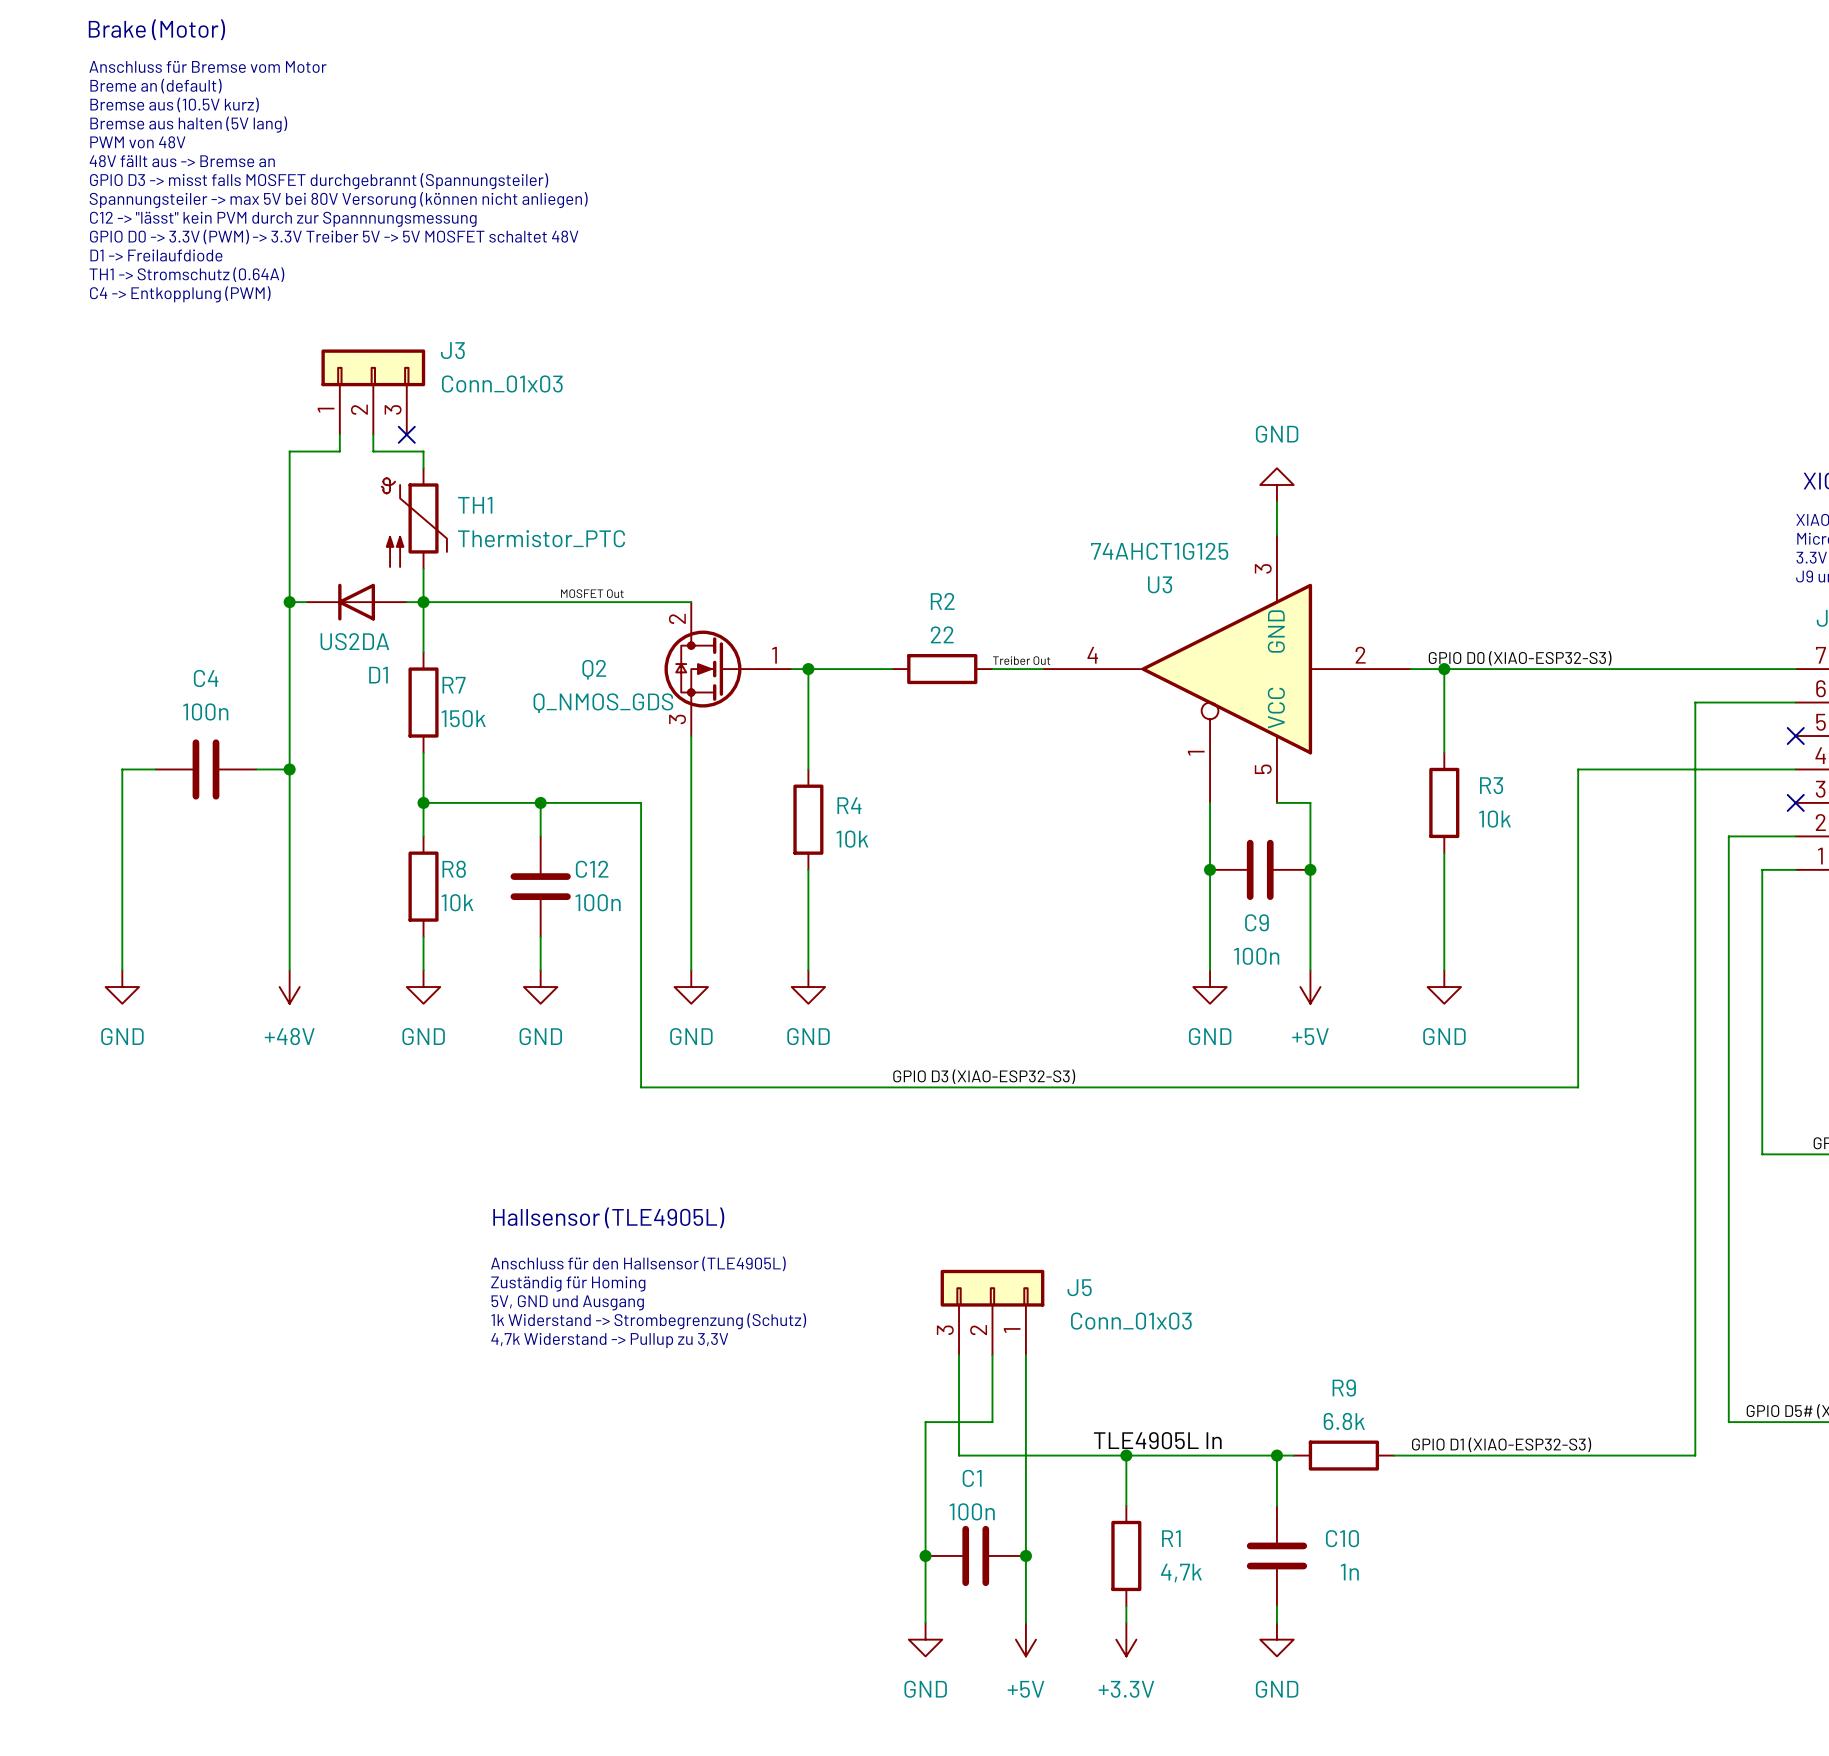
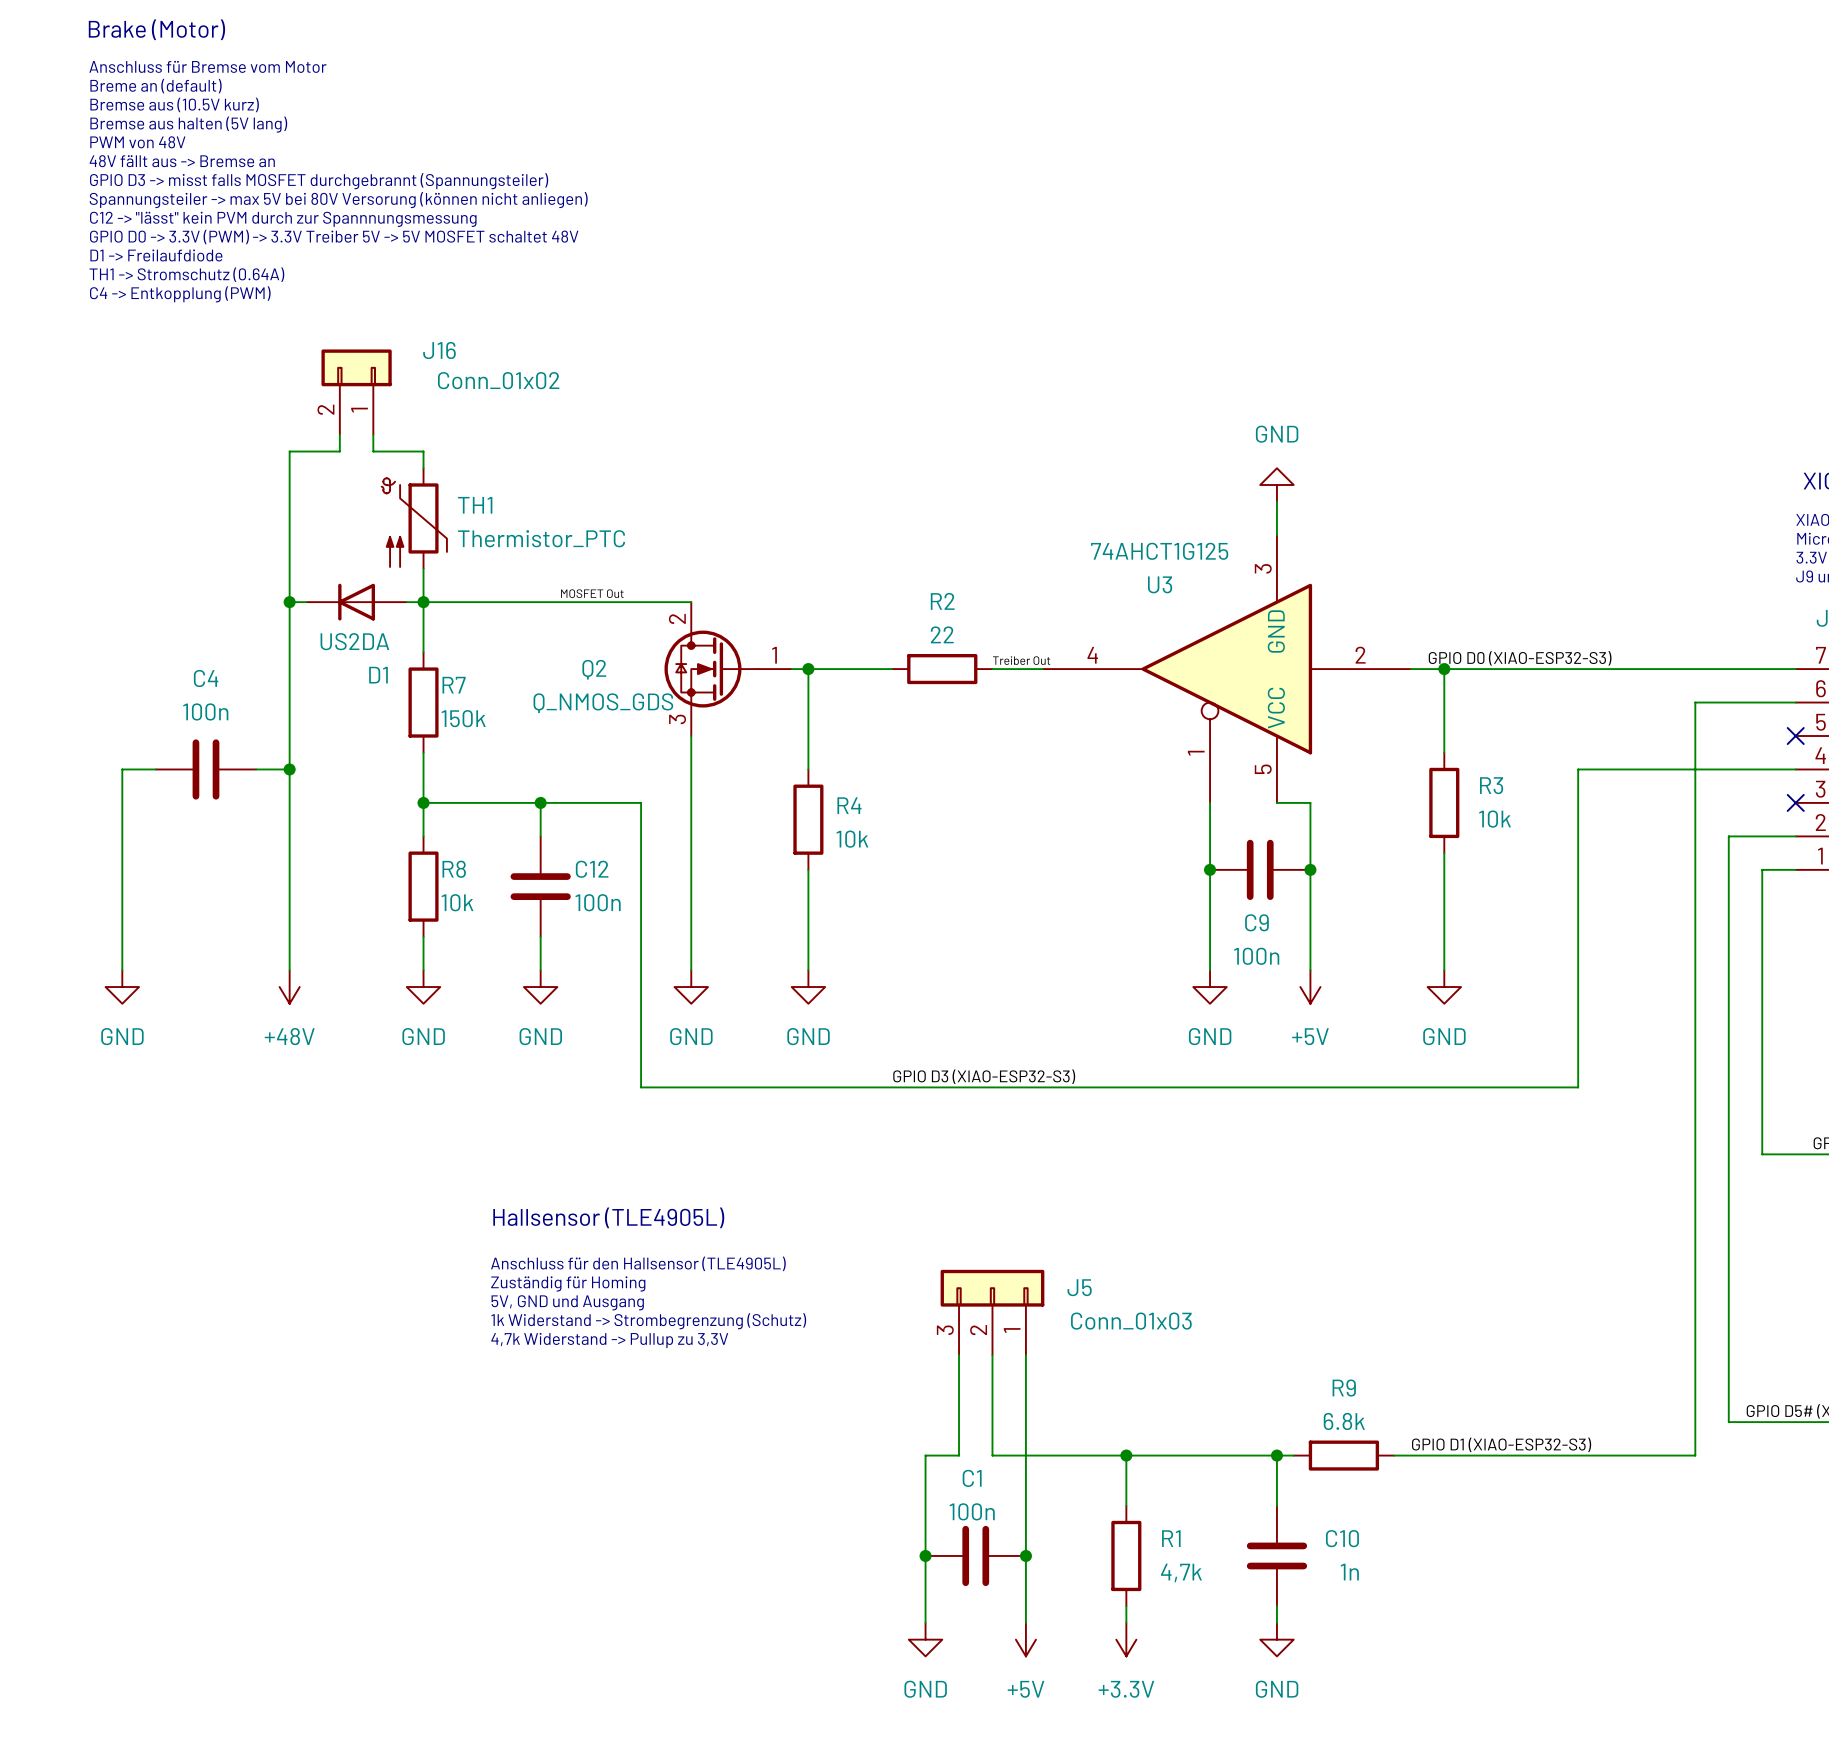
J16: none -> Conn_01x02 (356, 392)
J3: Conn_01x03 (373, 392) -> none
no-connect mark: (406, 434) -> none
wire: (992, 1422) (925, 1422) (925, 1455) -> (959, 1455) (925, 1455)
label: TLE4905L In (1157, 1440) -> none
wire: (959, 1455) (992, 1455) -> (992, 1422) (992, 1455)

